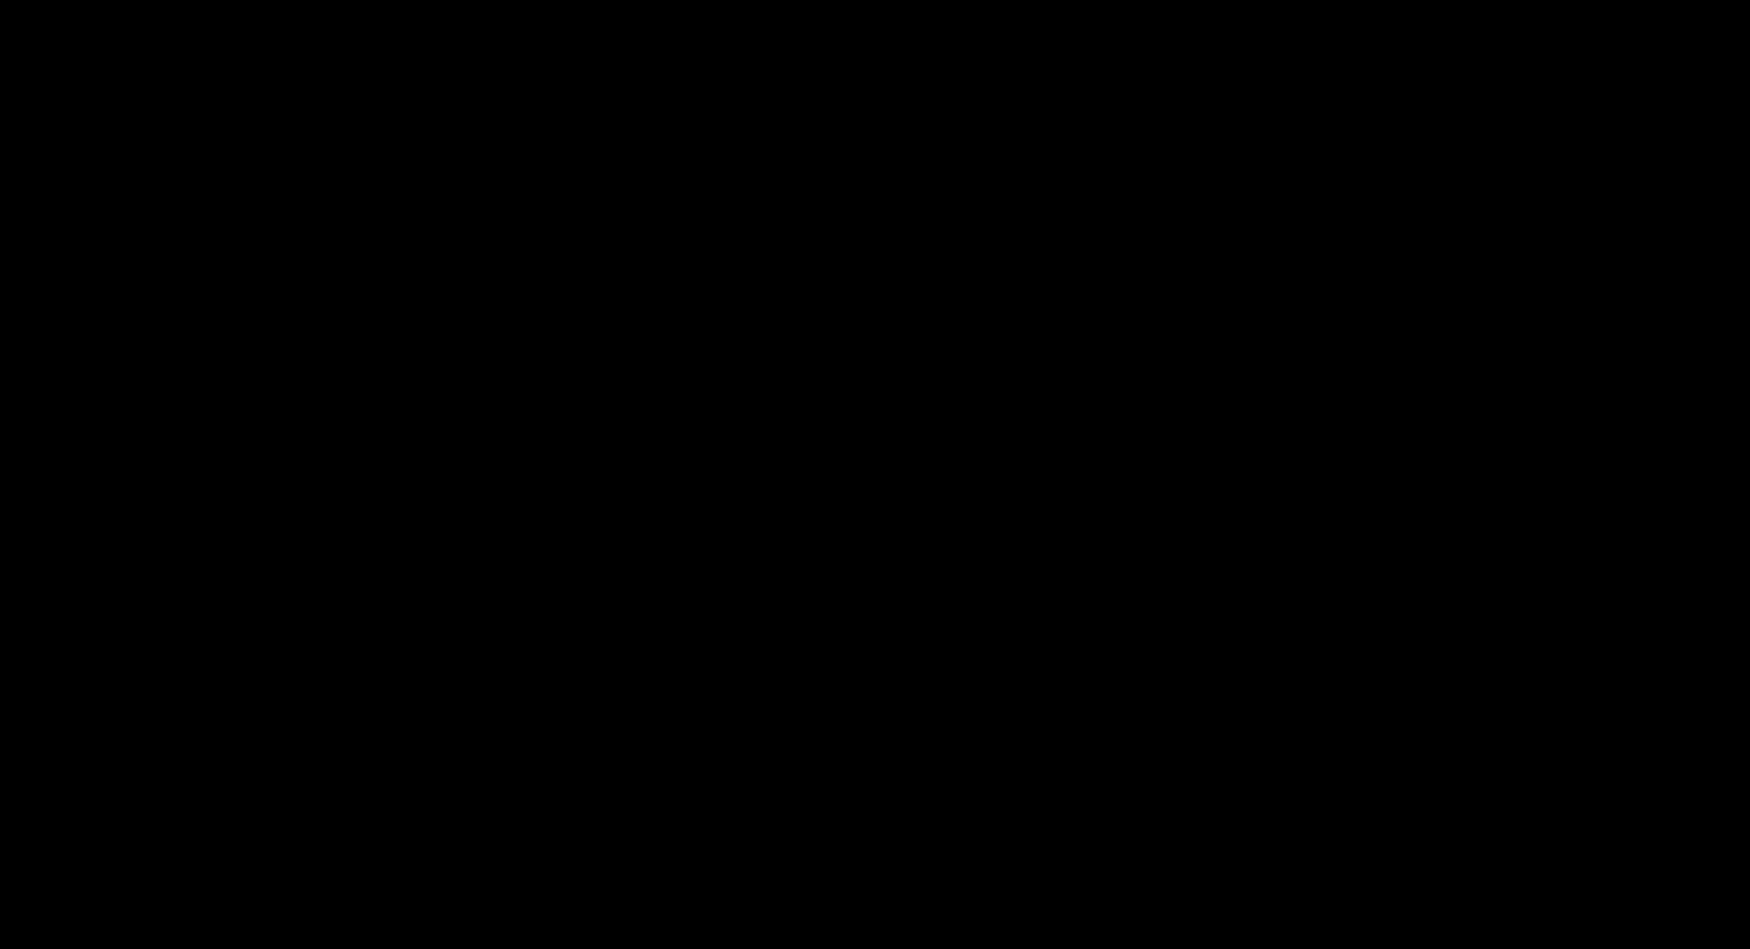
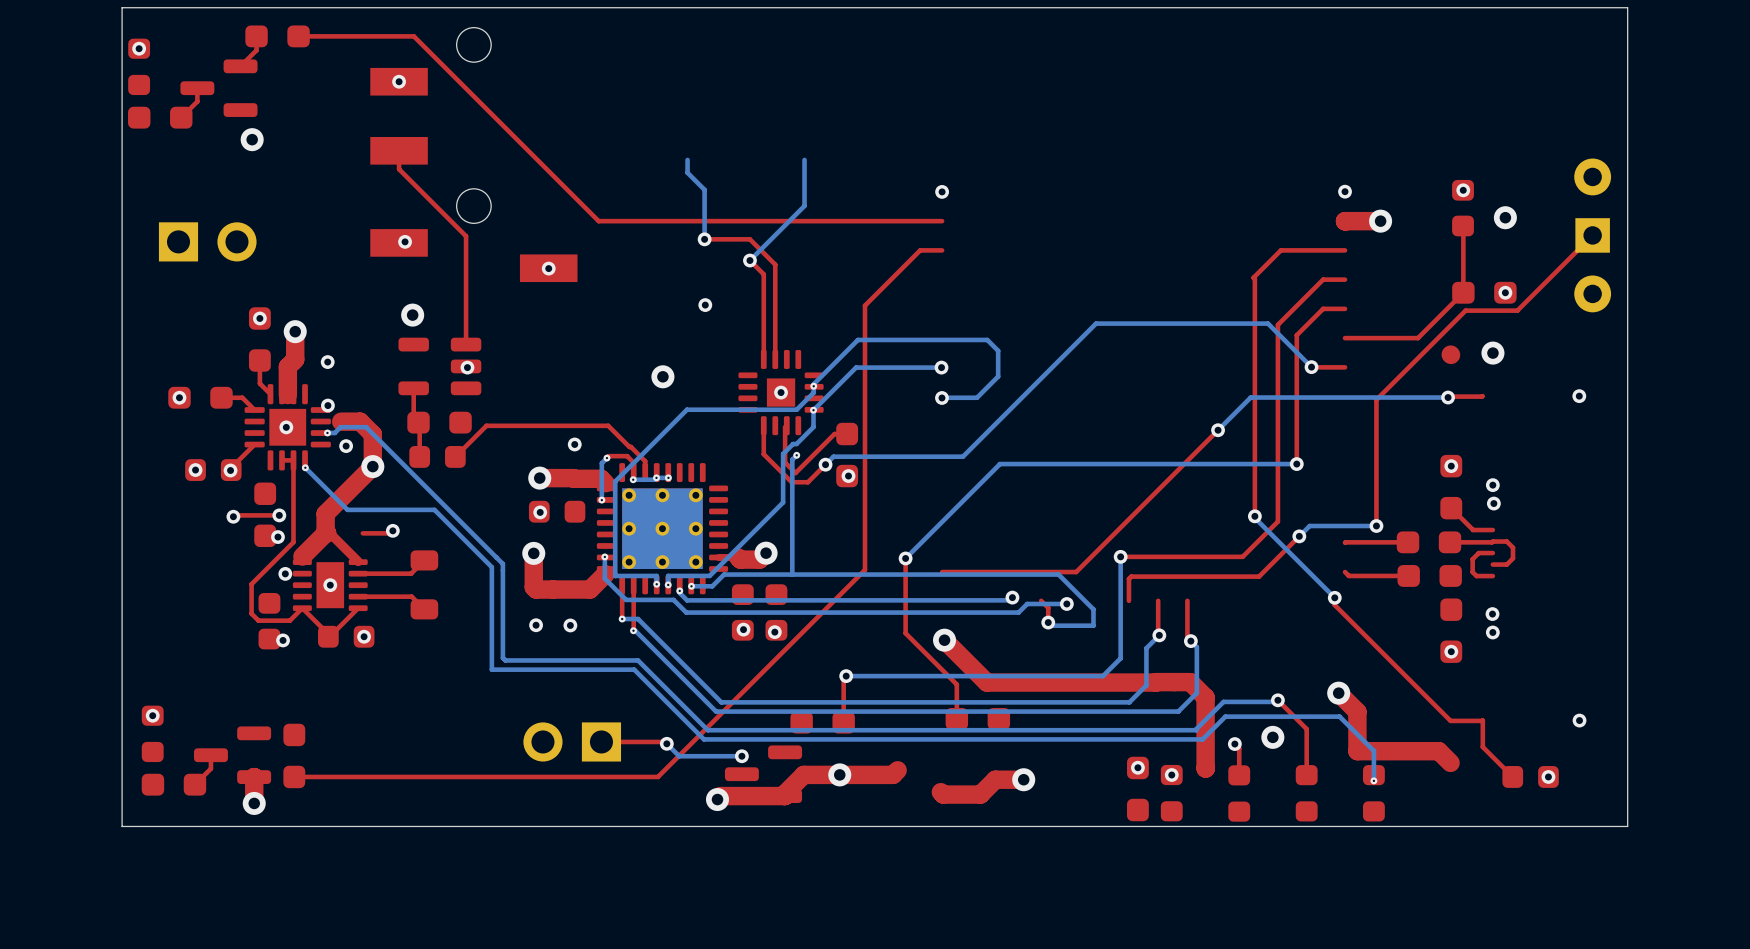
board edge: none -> (1627, 7) (122, 7) (122, 826) (1627, 826) (1627, 7)
top track: none -> (256, 36) (256, 50) (240, 66)
part: none -> (277, 36)
top track: none -> (298, 36) (413, 36) (598, 221) (942, 221)
via: none -> (139, 48)
part: none -> (139, 66)
via: none -> (399, 81)
top track: none -> (197, 88) (197, 101) (181, 117)
part: none -> (218, 88)
part: none -> (160, 117)
via: none -> (252, 139)
top track: none -> (399, 150) (399, 169) (466, 236) (466, 344)
part: none -> (473, 154)
bottom track: none -> (687, 159) (687, 172) (704, 189) (704, 239)
bottom track: none -> (804, 159) (804, 205) (749, 260)
via: none -> (1463, 190)
via: none -> (942, 191)
via: none -> (1345, 191)
part: none -> (1463, 208)
via: none -> (1505, 217)
top track: none -> (1380, 221) (1345, 221)
via: none -> (1380, 221)
top track: none -> (1463, 225) (1463, 292) (1418, 338) (1345, 338)
top track: none -> (1592, 235) (1517, 310) (1465, 310) (1376, 399) (1376, 526)
part: none -> (1592, 235)
top track: none -> (704, 239) (749, 239) (775, 264) (775, 359)
via: none -> (704, 239)
part: none -> (207, 241)
via: none -> (405, 241)
top track: none -> (942, 250) (920, 250) (864, 305) (864, 569) (657, 776) (294, 776)
top track: none -> (1345, 250) (1280, 250) (1253, 277) (1254, 516)
top track: none -> (749, 260) (763, 274) (763, 359)
via: none -> (749, 260)
via: none -> (548, 268)
top track: none -> (1345, 279) (1323, 279) (1277, 324) (1277, 521) (1242, 556) (1120, 556)
part: none -> (1484, 292)
via: none -> (1505, 292)
via: none -> (705, 305)
top track: none -> (1345, 308) (1323, 308) (1296, 335) (1296, 464)
via: none -> (412, 315)
via: none -> (259, 318)
top track: none -> (295, 331) (295, 359) (287, 366) (287, 395)
via: none -> (295, 331)
part: none -> (259, 339)
via: none -> (1492, 353)
top track: none -> (1450, 354) (1451, 354)
top track: none -> (259, 360) (259, 383) (270, 394)
via: none -> (327, 362)
part: none -> (439, 366)
via: none -> (467, 367)
bottom track: none -> (941, 367) (856, 367) (813, 410) (813, 427) (783, 454) (783, 502) (709, 575) (668, 575) (668, 584)
via: none -> (941, 367)
bottom track: none -> (1311, 367) (1267, 323) (1096, 323) (962, 456) (833, 456) (825, 464)
via: none -> (1311, 367)
top track: none -> (1345, 367) (1311, 367)
via: none -> (662, 376)
via: none -> (813, 386)
top track: none -> (413, 388) (413, 417) (419, 423) (419, 456)
part: none -> (781, 392)
via: none -> (781, 392)
top track: none -> (1482, 396) (1448, 397)
via: none -> (1579, 396)
via: none -> (179, 397)
part: none -> (200, 397)
top track: none -> (221, 397) (242, 397) (254, 410)
via: none -> (941, 397)
bottom track: none -> (942, 397) (976, 397) (998, 376) (998, 350) (987, 339) (857, 339) (813, 384) (813, 392) (796, 409) (687, 409) (615, 481) (615, 575) (656, 575) (656, 584)
bottom track: none -> (1448, 397) (1250, 397) (1218, 430)
via: none -> (1448, 397)
via: none -> (327, 405)
via: none -> (813, 410)
top track: none -> (341, 421) (360, 421) (372, 434) (372, 466) (325, 513) (325, 533) (302, 556)
part: none -> (439, 422)
top track: none -> (763, 425) (763, 454) (791, 482) (807, 482) (825, 464)
top track: none -> (786, 425) (785, 427) (785, 462) (795, 473) (834, 434) (847, 434)
via: none -> (286, 427)
part: none -> (287, 427)
top track: none -> (1218, 430) (1076, 572) (942, 572)
via: none -> (1218, 430)
bottom track: none -> (327, 432) (334, 432) (340, 427) (366, 427) (502, 563) (502, 657) (505, 660) (638, 660) (707, 730) (1196, 730) (1223, 701) (1276, 701) (1277, 700)
via: none -> (327, 432)
top track: none -> (254, 444) (231, 470)
via: none -> (574, 444)
via: none -> (346, 446)
bottom track: none -> (796, 455) (792, 459) (792, 574)
via: none -> (796, 455)
part: none -> (847, 455)
part: none -> (437, 456)
top track: none -> (455, 456) (486, 425) (608, 425) (645, 461) (645, 472)
top track: none -> (606, 458) (608, 456) (627, 456) (633, 462) (633, 479)
bottom track: none -> (606, 458) (601, 463) (601, 500)
via: none -> (606, 458)
top track: none -> (281, 460) (293, 460) (293, 542) (251, 584) (251, 613) (258, 620) (289, 620) (302, 608) (329, 636) (358, 608)
via: none -> (825, 464)
bottom track: none -> (1296, 464) (1000, 464) (905, 558)
via: none -> (1296, 464)
via: none -> (372, 466)
via: none -> (1451, 466)
bottom track: none -> (305, 467) (347, 509) (434, 509) (491, 567) (491, 669) (634, 669) (704, 739) (1202, 739) (1225, 716) (1339, 716) (1373, 750) (1373, 780)
via: none -> (305, 467)
via: none -> (195, 470)
part: none -> (213, 470)
via: none -> (230, 470)
via: none -> (848, 476)
via: none -> (656, 477)
bottom track: none -> (668, 477) (633, 479)
via: none -> (668, 477)
top track: none -> (539, 478) (601, 478) (605, 483)
via: none -> (539, 478)
via: none -> (633, 479)
via: none -> (1492, 485)
part: none -> (1451, 487)
via: none -> (601, 500)
via: none -> (1493, 503)
top track: none -> (1451, 508) (1473, 530) (1492, 530)
part: none -> (557, 511)
via: none -> (540, 512)
part: none -> (265, 514)
top track: none -> (279, 515) (233, 516)
via: none -> (279, 515)
via: none -> (233, 516)
bottom track: none -> (1254, 516) (1334, 597)
via: none -> (1254, 516)
bottom track: none -> (1376, 526) (1309, 526) (1299, 536)
via: none -> (1376, 526)
part: none -> (662, 528)
top track: none -> (392, 530) (390, 533) (362, 533)
via: none -> (392, 530)
top track: none -> (327, 533) (325, 531) (328, 531) (358, 561)
top track: none -> (1299, 536) (1259, 576) (1131, 576) (1128, 578) (1128, 600)
via: none -> (1299, 536)
via: none -> (277, 537)
top track: none -> (1408, 542) (1345, 542)
part: none -> (1429, 542)
top track: none -> (1450, 542) (1506, 541) (1513, 547) (1513, 558) (1506, 564) (1492, 564)
top track: none -> (533, 553) (533, 587) (536, 589) (590, 589) (605, 574)
via: none -> (533, 553)
top track: none -> (766, 553) (759, 559) (718, 557)
via: none -> (766, 553)
top track: none -> (1492, 553) (1478, 553) (1472, 559) (1472, 572) (1476, 576) (1492, 576)
bottom track: none -> (604, 556) (604, 578) (626, 599) (673, 599) (686, 612) (1018, 612) (1027, 603) (1066, 603)
via: none -> (604, 556)
bottom track: none -> (1120, 556) (1120, 658) (1102, 676) (846, 676)
via: none -> (1120, 556)
top track: none -> (905, 558) (905, 633) (956, 684) (956, 718)
via: none -> (905, 558)
top track: none -> (424, 560) (411, 573) (358, 573)
top track: none -> (1345, 572) (1348, 575) (1408, 575)
via: none -> (285, 573)
part: none -> (1429, 575)
part: none -> (424, 584)
top track: none -> (622, 584) (622, 619)
top track: none -> (633, 584) (633, 630)
via: none -> (656, 584)
via: none -> (668, 584)
part: none -> (330, 585)
via: none -> (330, 585)
bottom track: none -> (691, 586) (712, 586) (724, 574) (1058, 574) (1093, 609) (1093, 625) (1051, 625) (1048, 622)
via: none -> (691, 586)
bottom track: none -> (679, 590) (687, 600) (1009, 600) (1012, 597)
via: none -> (679, 590)
top track: none -> (358, 596) (411, 596) (424, 609)
via: none -> (1012, 597)
top track: none -> (1334, 597) (1334, 605) (1450, 720) (1482, 720) (1482, 747) (1512, 776)
via: none -> (1334, 597)
top track: none -> (1041, 600) (1048, 607) (1048, 622)
top track: none -> (1158, 600) (1158, 638)
top track: none -> (1187, 600) (1187, 637) (1190, 640)
via: none -> (1066, 603)
part: none -> (742, 612)
part: none -> (776, 612)
via: none -> (1492, 614)
bottom track: none -> (622, 619) (638, 619) (721, 702) (1129, 702) (1146, 685) (1146, 648) (1159, 635)
via: none -> (622, 619)
part: none -> (269, 621)
via: none -> (1048, 622)
via: none -> (536, 625)
via: none -> (570, 625)
via: none -> (743, 629)
bottom track: none -> (633, 630) (716, 711) (1178, 711) (1196, 693) (1196, 647) (1190, 641)
via: none -> (633, 630)
part: none -> (1451, 630)
via: none -> (774, 632)
via: none -> (1492, 632)
via: none -> (1159, 635)
part: none -> (346, 636)
via: none -> (364, 636)
via: none -> (283, 640)
top track: none -> (944, 640) (986, 682) (1190, 682) (1205, 697) (1205, 768)
via: none -> (944, 640)
via: none -> (1190, 641)
via: none -> (1451, 651)
top track: none -> (846, 676) (843, 678) (843, 722)
via: none -> (846, 676)
top track: none -> (1338, 693) (1357, 711) (1357, 751) (1438, 751) (1450, 762)
via: none -> (1338, 693)
top track: none -> (1277, 700) (1306, 729) (1306, 775)
via: none -> (1277, 700)
via: none -> (152, 715)
part: none -> (977, 718)
via: none -> (1579, 720)
part: none -> (822, 722)
part: none -> (152, 733)
via: none -> (1272, 737)
part: none -> (572, 741)
top track: none -> (601, 741) (665, 741) (666, 743)
bottom track: none -> (666, 743) (679, 756) (741, 756)
via: none -> (666, 743)
top track: none -> (1234, 744) (1239, 748) (1239, 775)
via: none -> (1234, 744)
top track: none -> (210, 755) (210, 768) (194, 784)
part: none -> (232, 755)
part: none -> (294, 755)
via: none -> (741, 756)
via: none -> (1137, 767)
top track: none -> (897, 770) (893, 774) (803, 774) (784, 796)
part: none -> (763, 774)
via: none -> (839, 774)
via: none -> (1171, 775)
part: none -> (1530, 776)
via: none -> (1548, 776)
top track: none -> (1023, 779) (995, 779) (980, 794) (943, 794) (940, 792)
via: none -> (1023, 779)
via: none -> (1373, 780)
part: none -> (173, 784)
part: none -> (1137, 788)
part: none -> (1171, 793)
part: none -> (1239, 793)
part: none -> (1306, 793)
part: none -> (1373, 793)
top track: none -> (785, 796) (720, 796) (717, 799)
via: none -> (717, 799)
via: none -> (254, 803)

